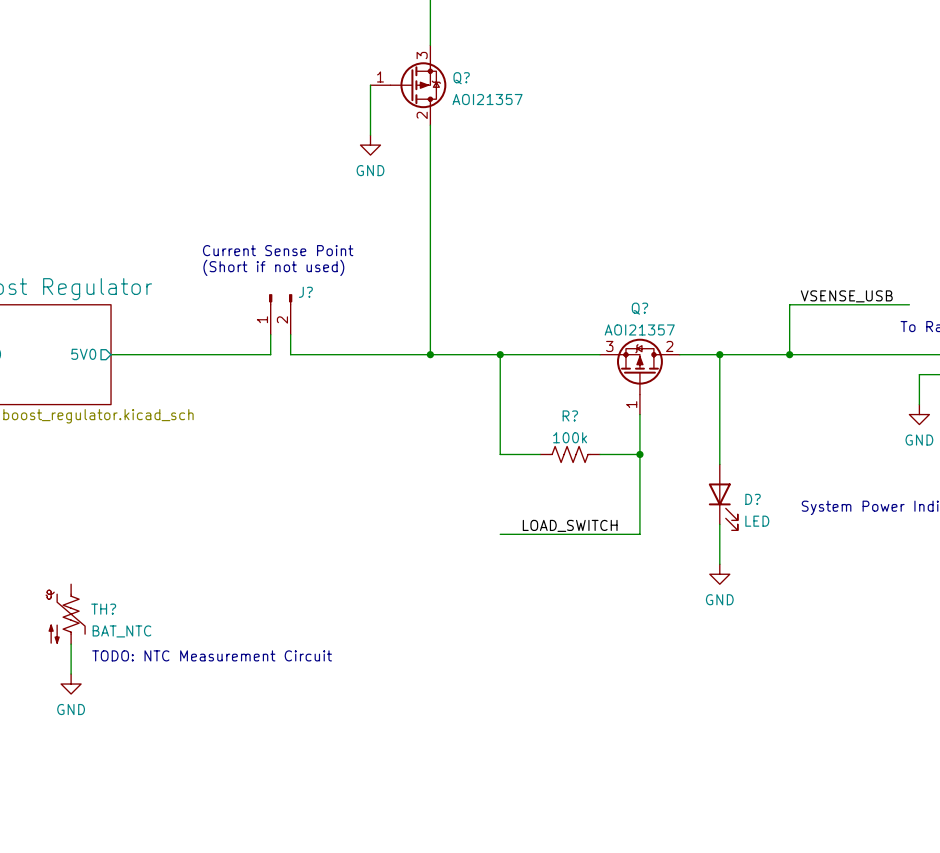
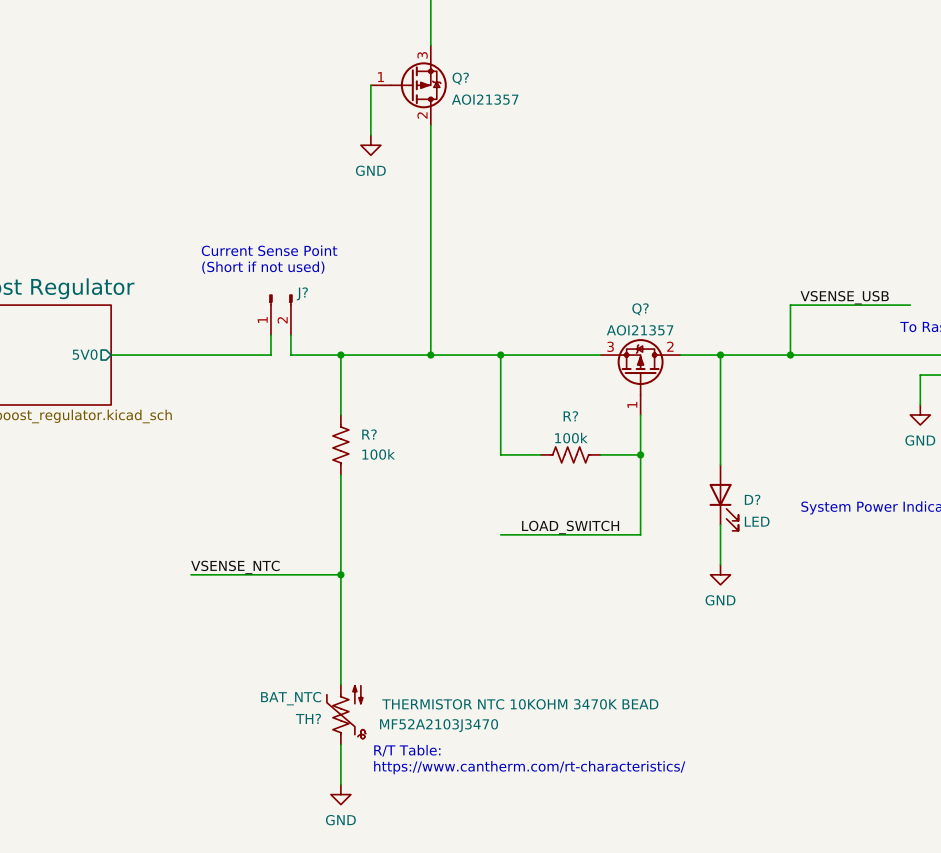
wire: none -> (340, 355) (340, 414)
junction: none -> (340, 355)
R?: none -> 100k (340, 444)
wire: none -> (340, 474) (340, 684)
label: none -> VSENSE_NTC (235, 567)
wire: none -> (191, 574) (340, 574)
junction: none -> (340, 574)
TH?: BAT_NTC (65, 614) -> none
wire: (71, 644) (71, 674) -> none
text: TODO: NTC Measurement Circuit (212, 655) -> none
power symbol: GND (71, 684) -> none
TH?: none -> BAT_NTC (346, 714)
wire: none -> (340, 744) (340, 784)
text: none -> R/T Table: (407, 750)
text: none -> https://www.cantherm.com/rt-characteristics/ (529, 767)
power symbol: none -> GND (340, 794)

